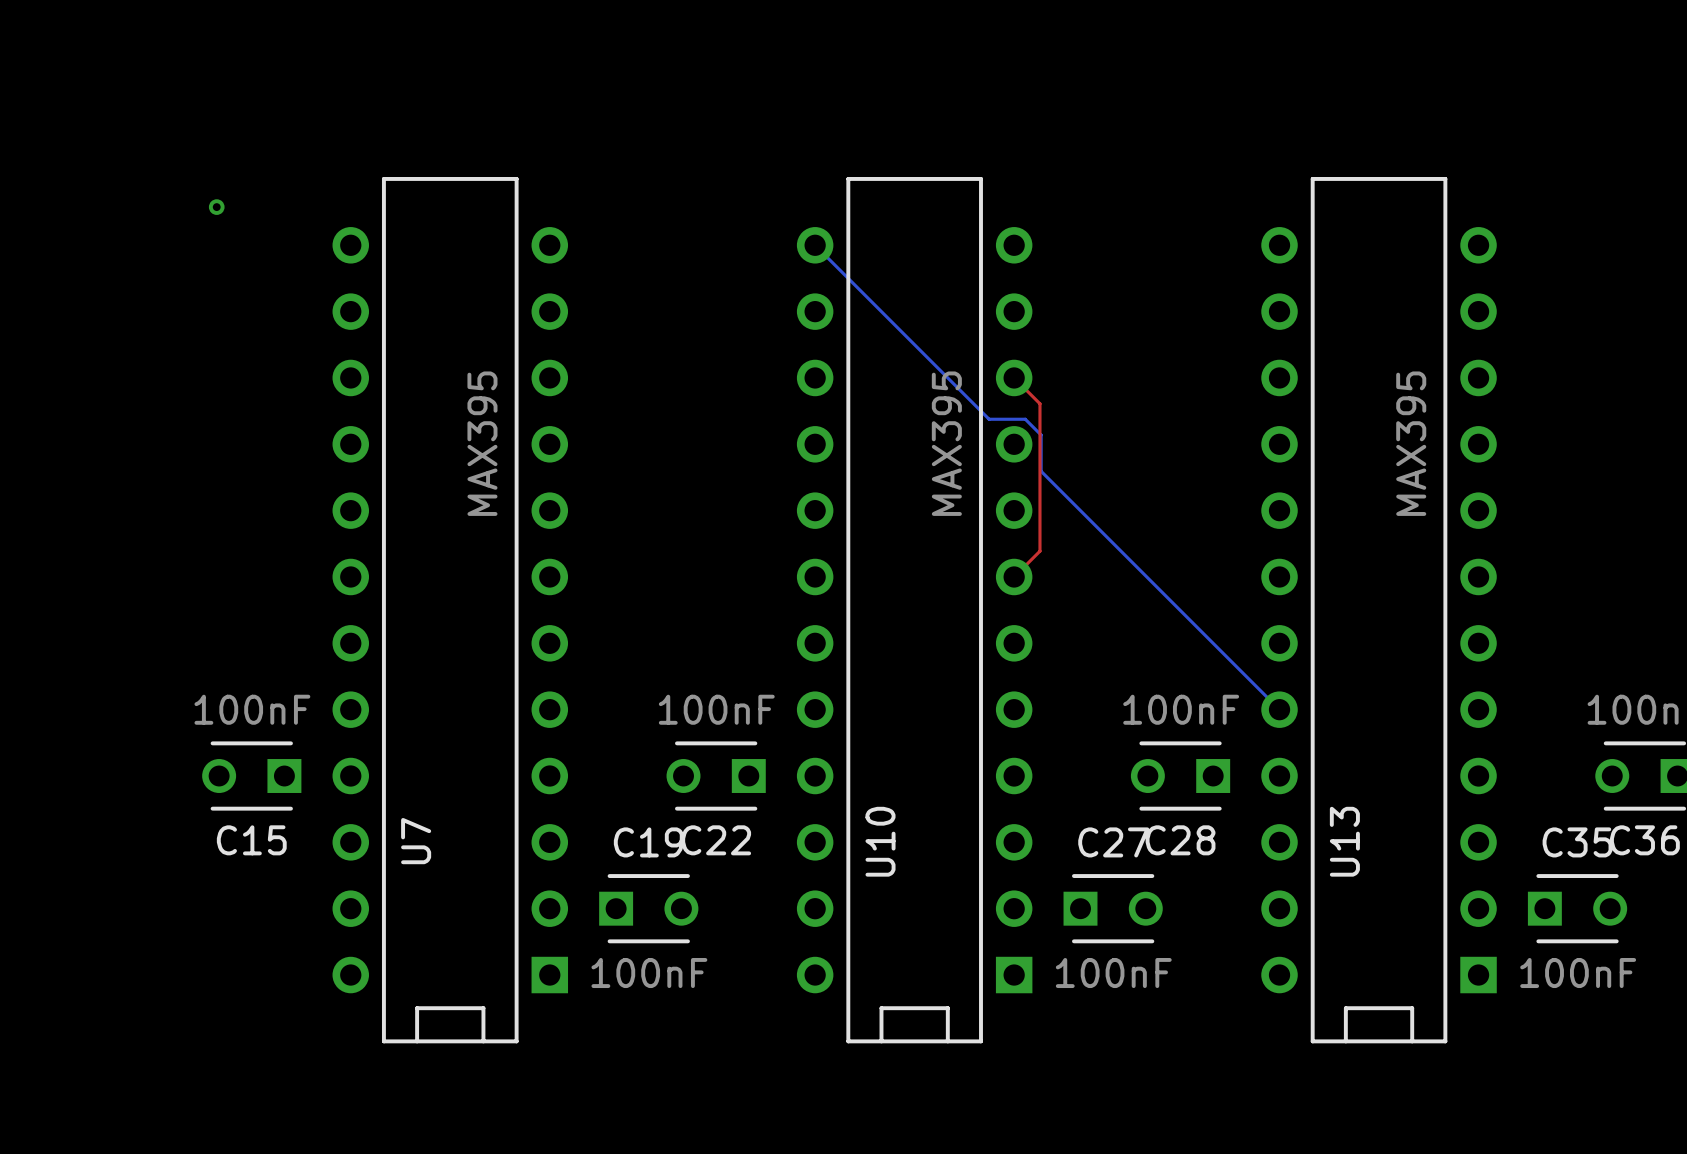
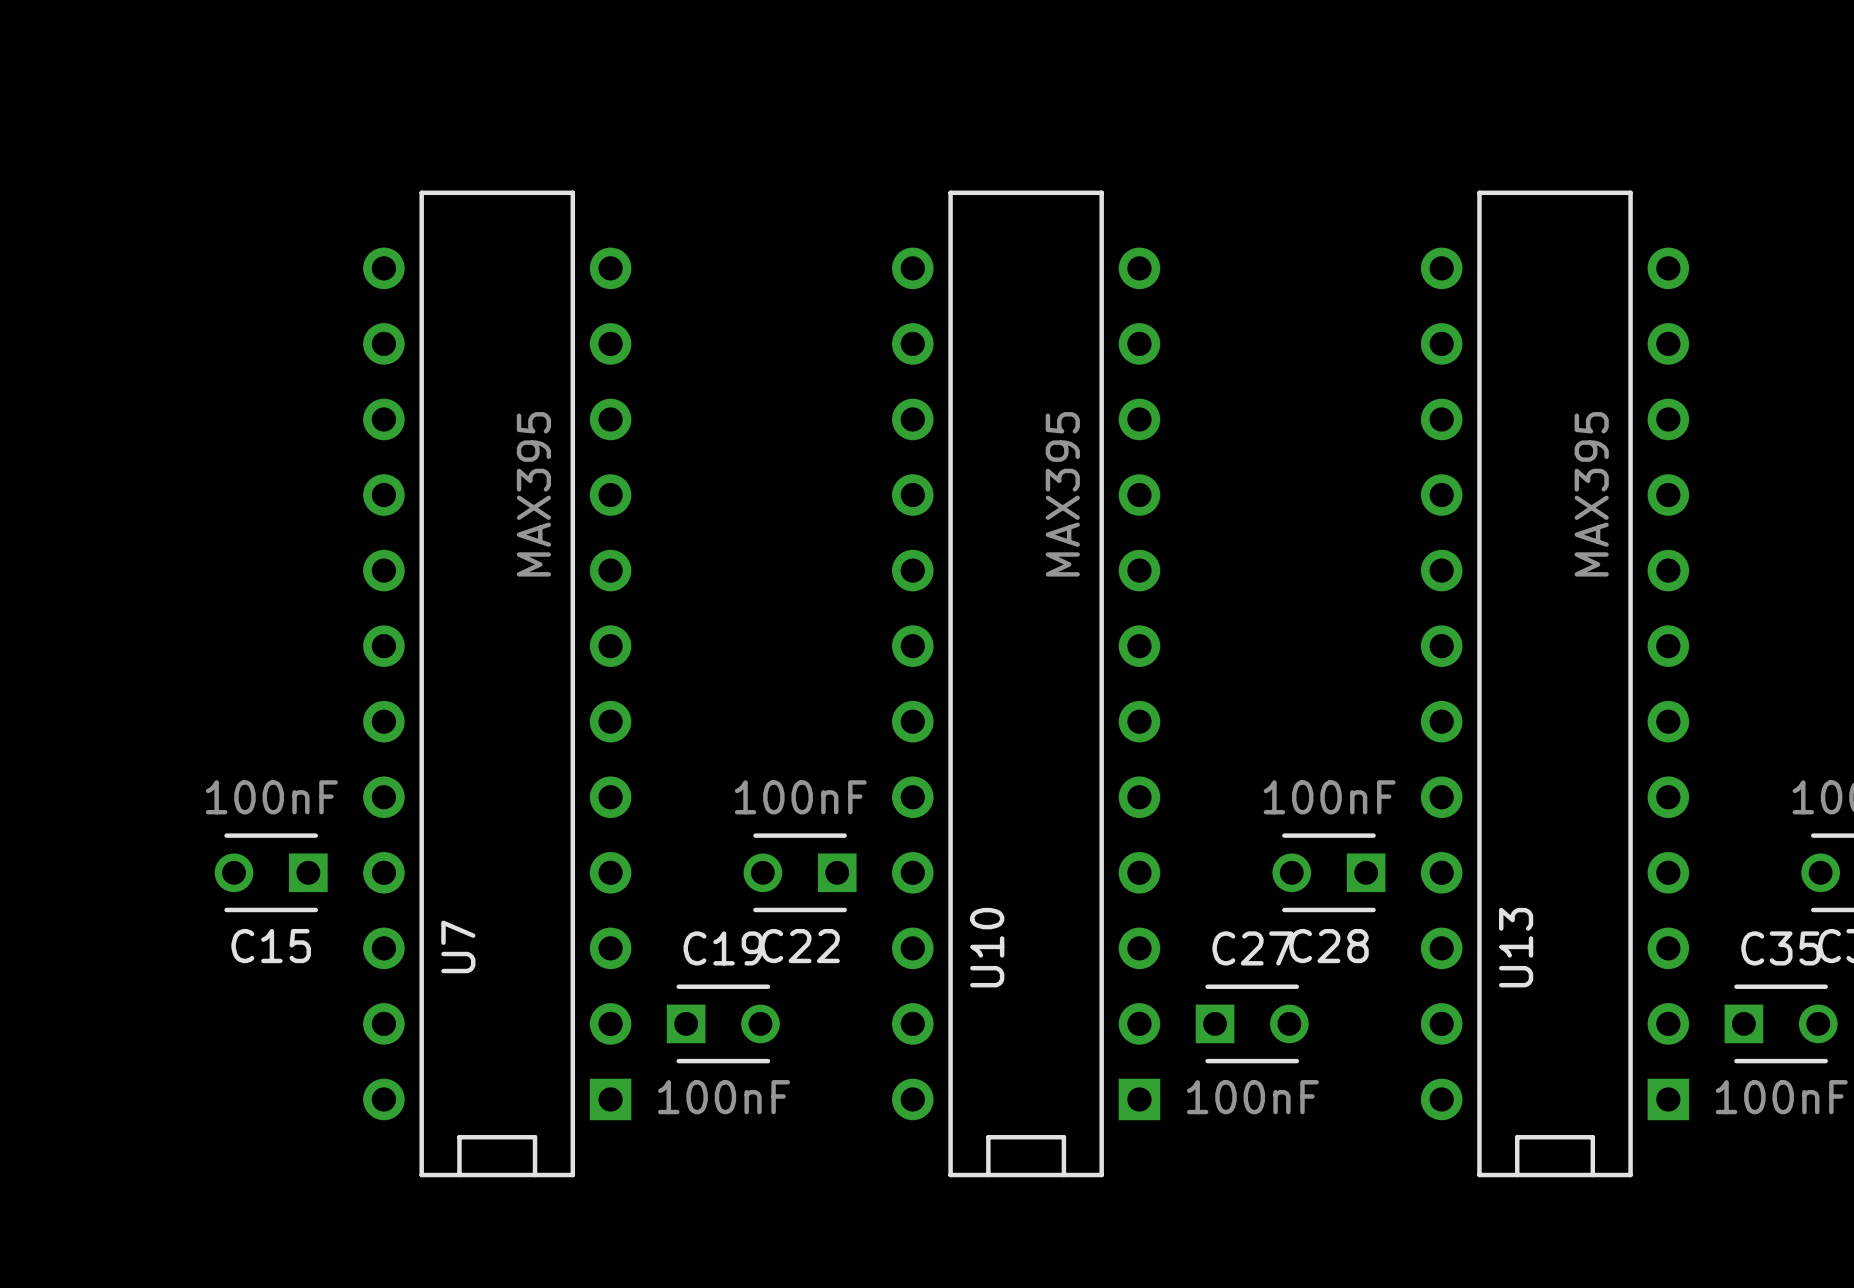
via: (216, 207) -> none
bottom track: (815, 245) (989, 419) (1025, 419) (1041, 435) (1041, 471) (1279, 709) -> none
top track: (1014, 377) (1039, 403) (1039, 551) (1014, 576) -> none

